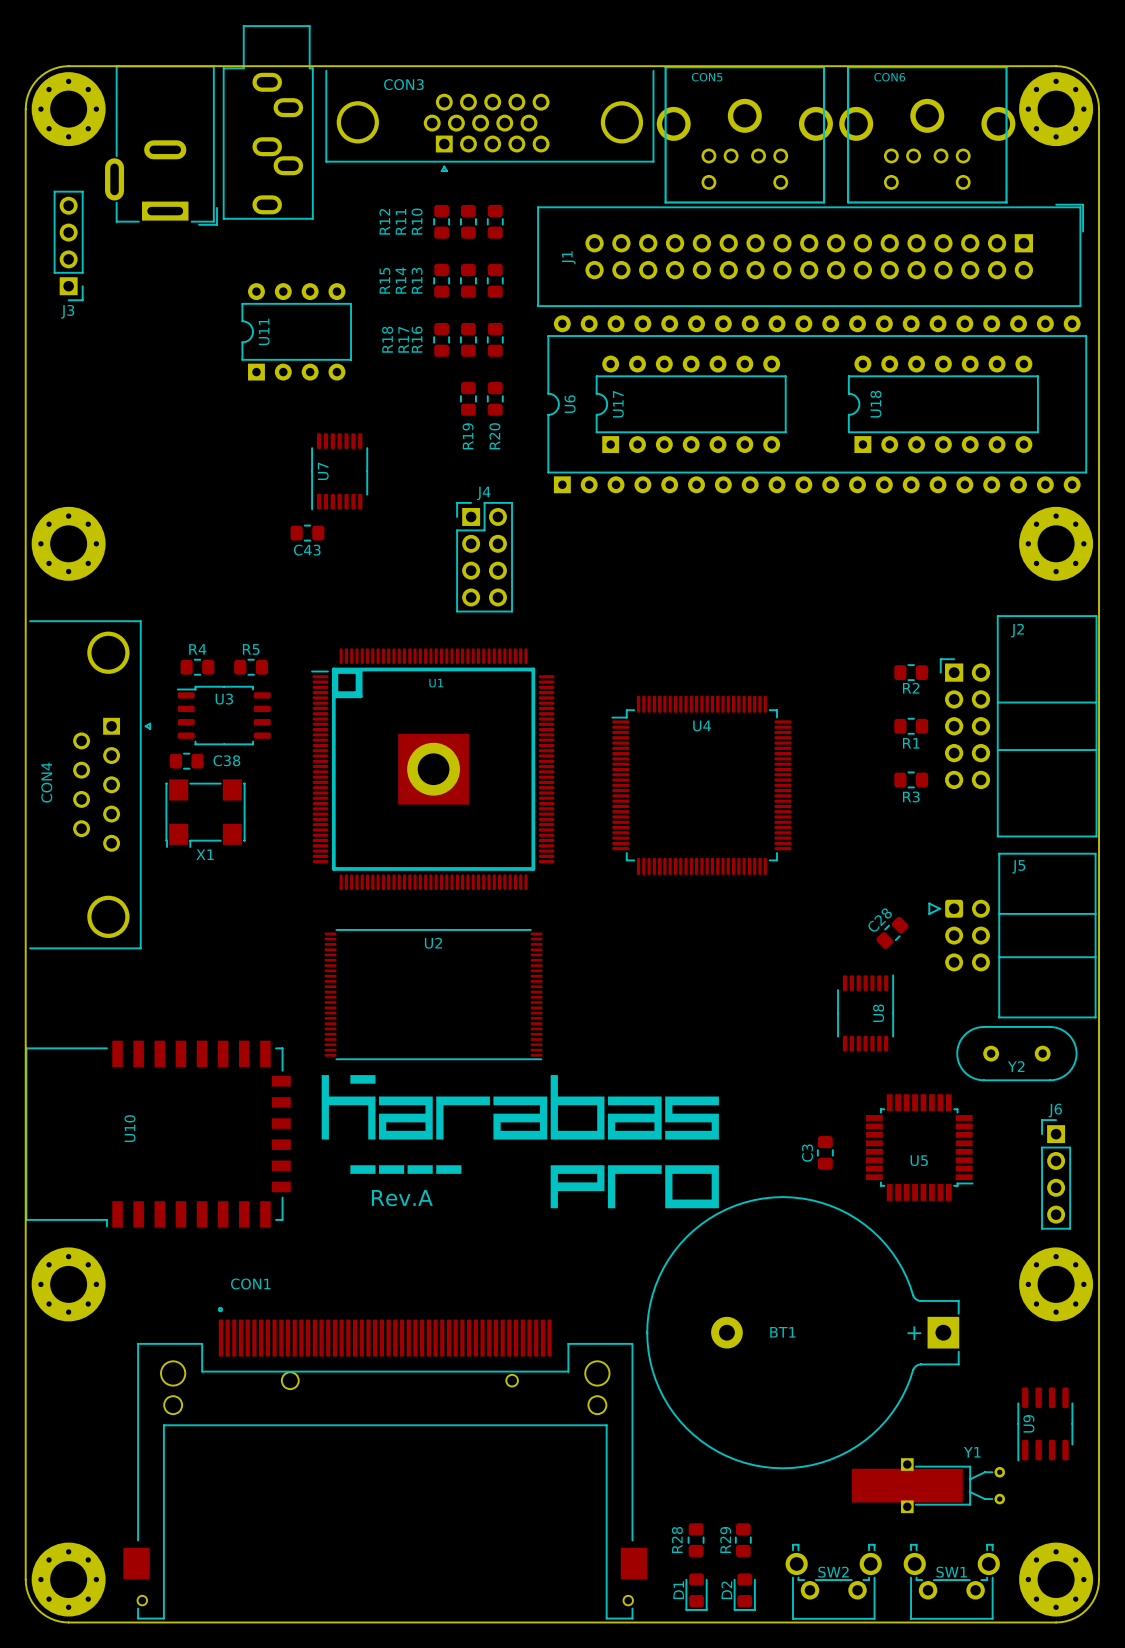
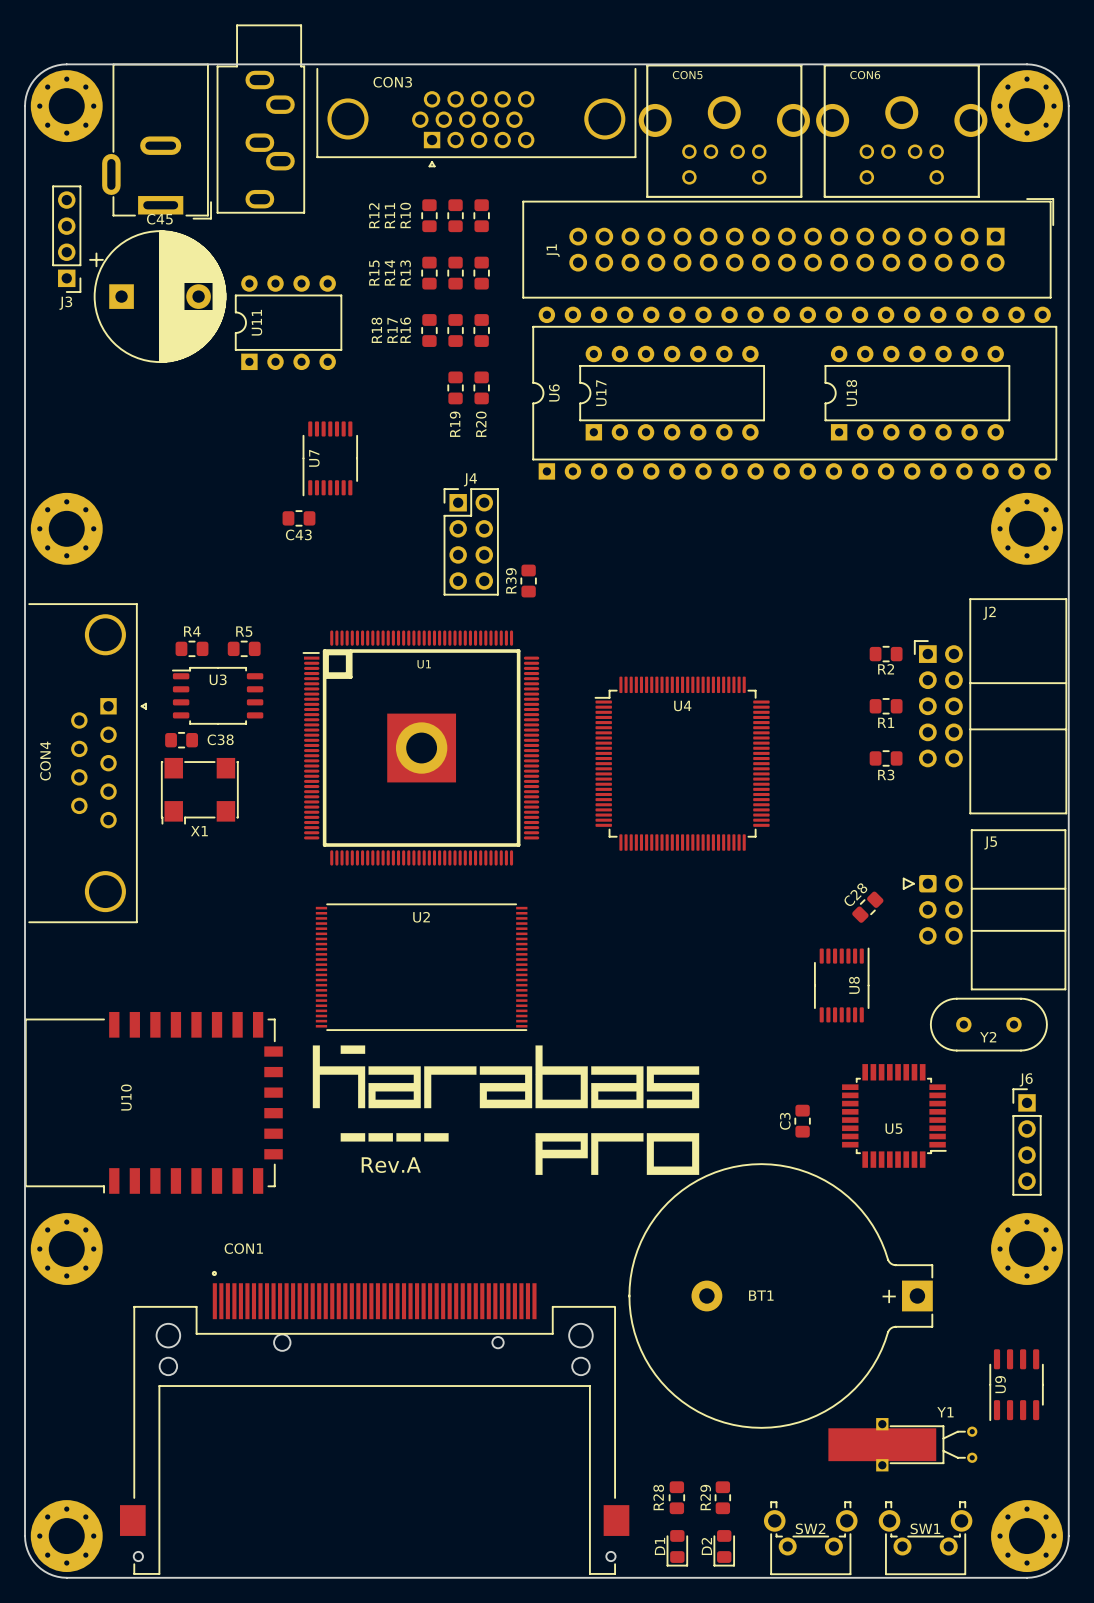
C45: none -> (157, 296)
R39: none -> (528, 581)

